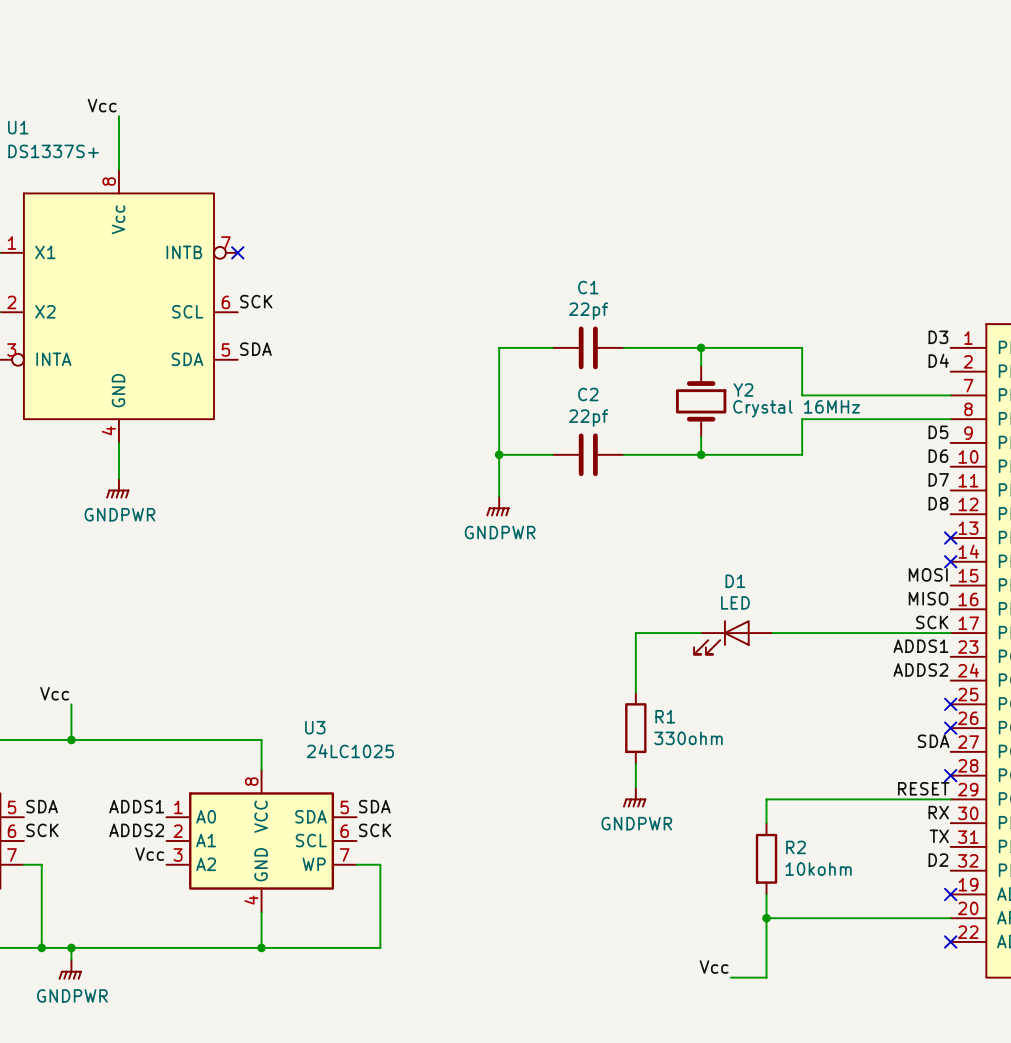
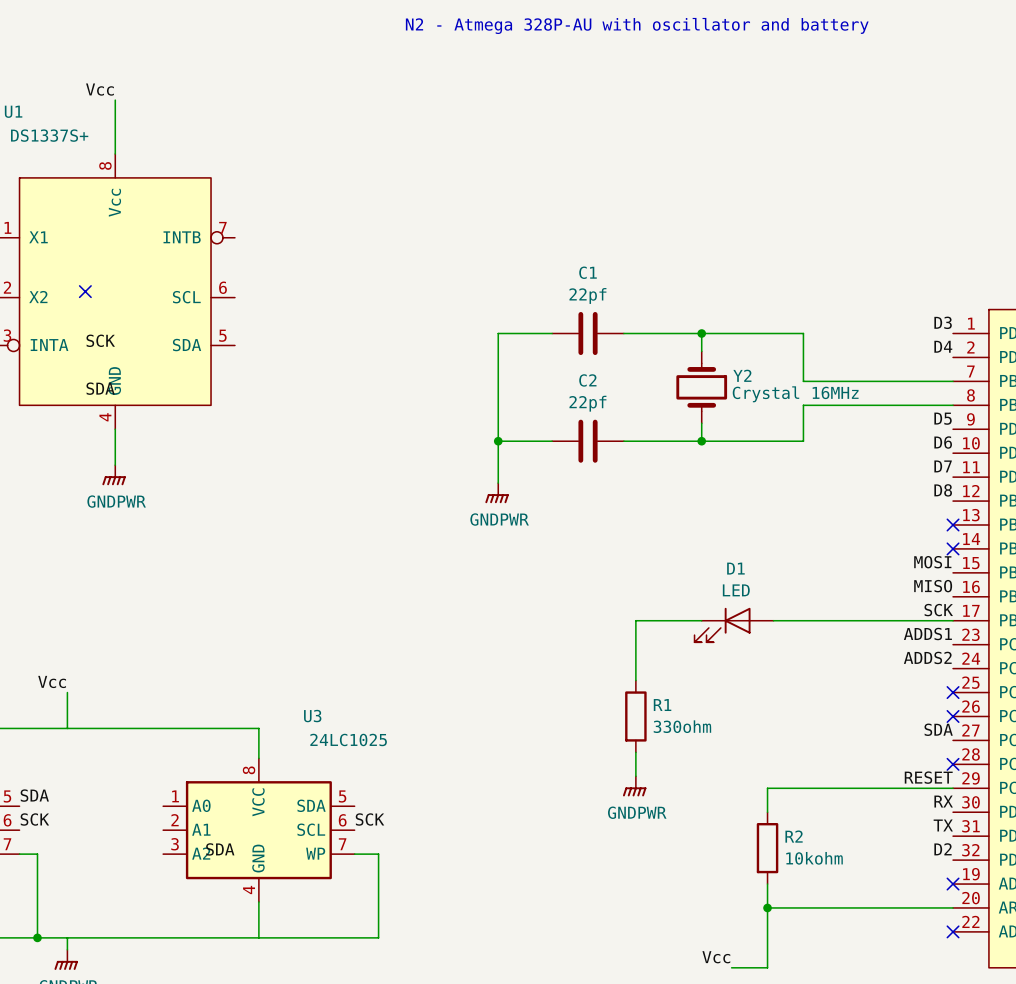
text: none -> N2 - Atmega 328P-AU with oscillator and battery (637, 25)
no-connect mark: (237, 252) -> none
label position: SCK (256, 301) -> SCK (100, 340)
no-connect mark: none -> (85, 291)
label position: SDA (255, 349) -> SDA (100, 388)
junction: (71, 739) -> none
label: ADDS1 (136, 806) -> none
label position: SDA (374, 806) -> SDA (220, 849)
label: ADDS2 (136, 830) -> none
label: Vcc (149, 854) -> none
junction: (71, 947) -> none
junction: (261, 947) -> none

